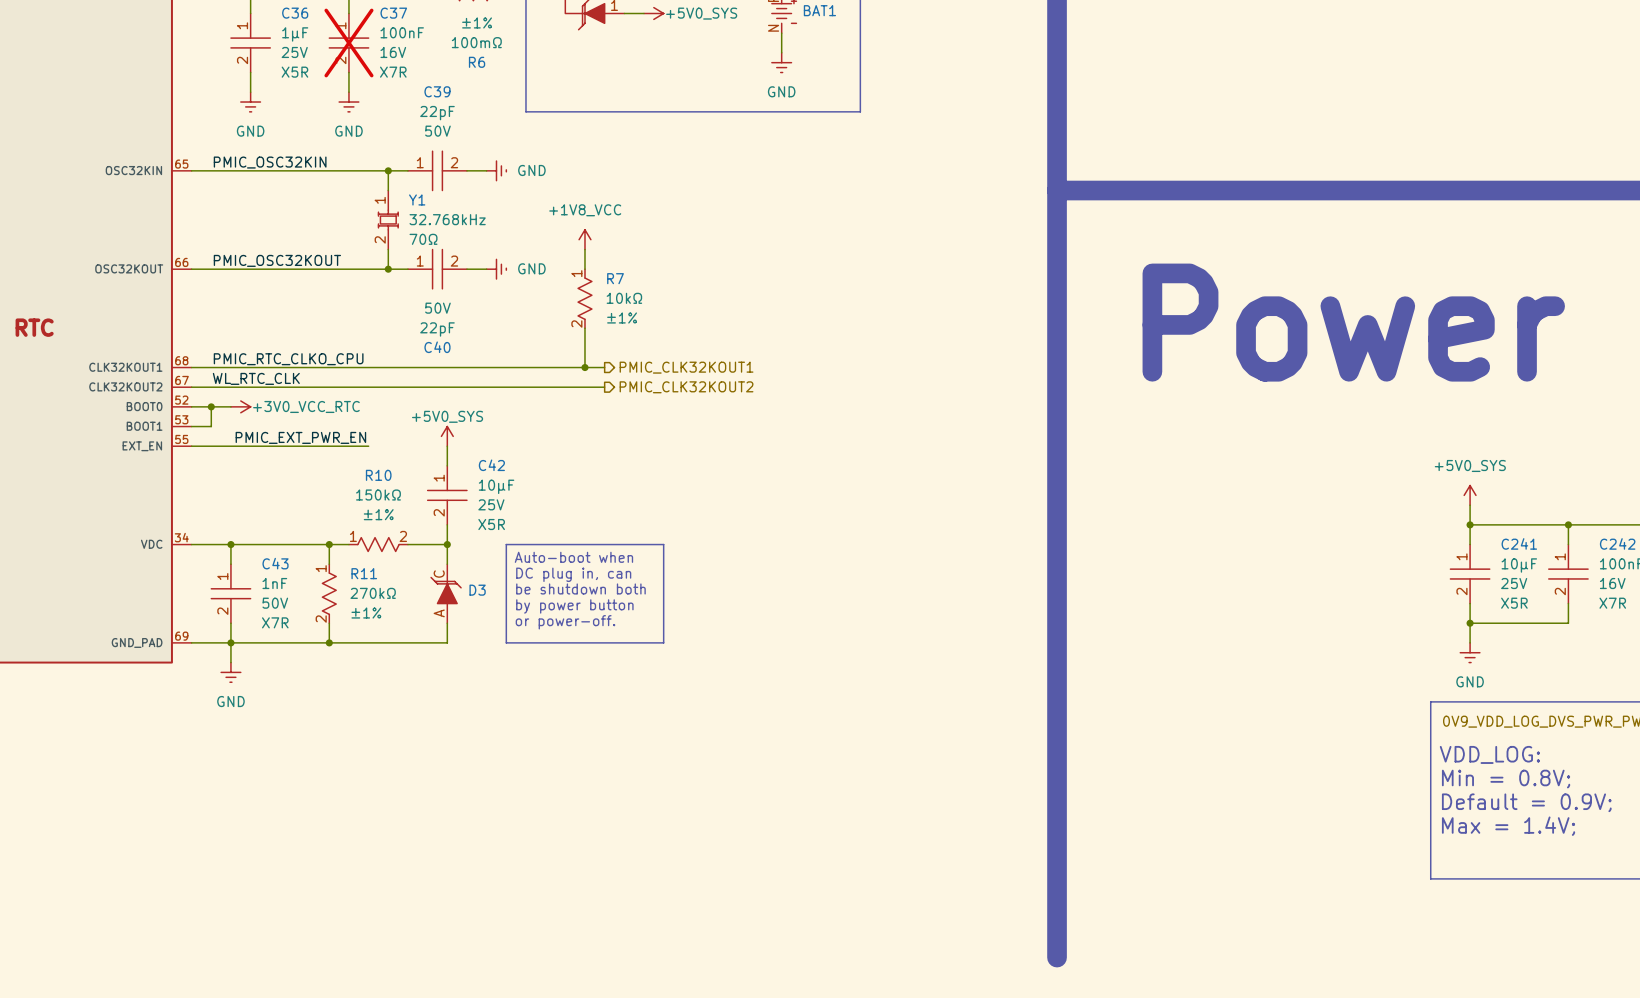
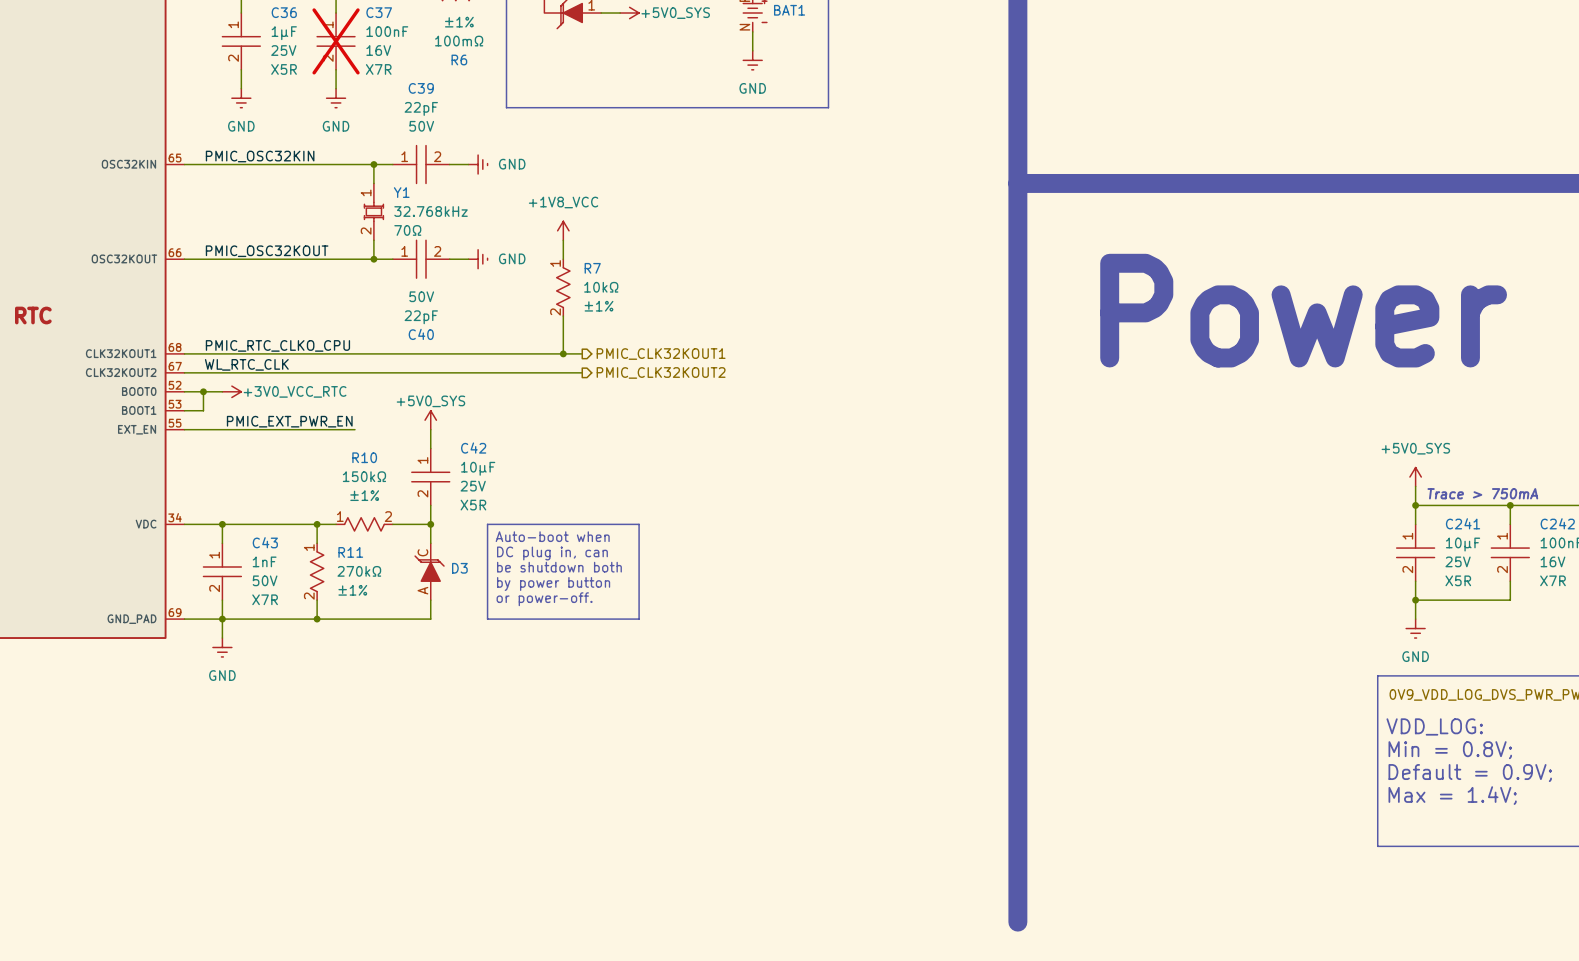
text: none -> Trace > 750mA (1482, 493)

